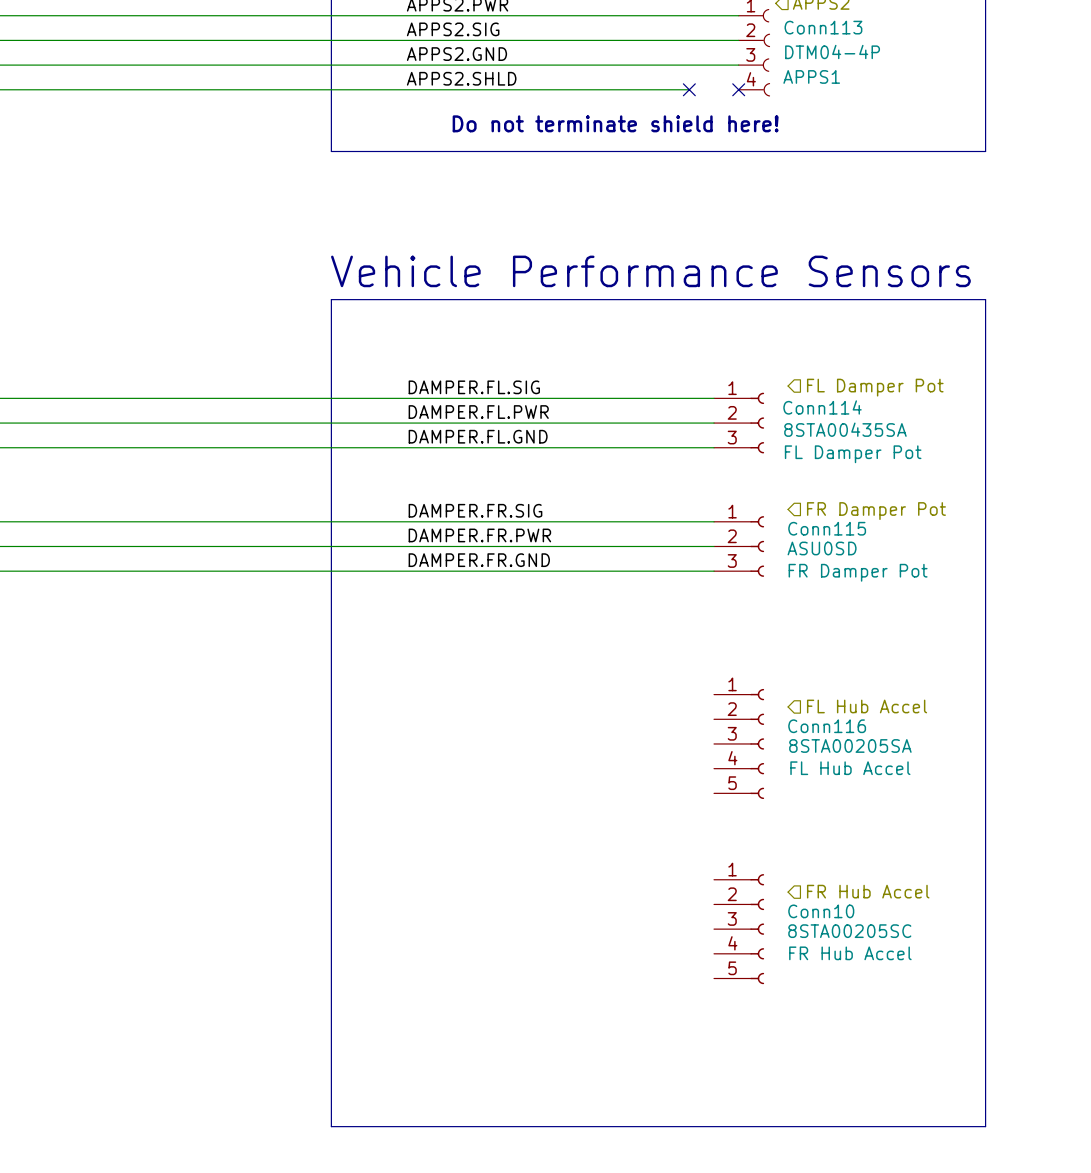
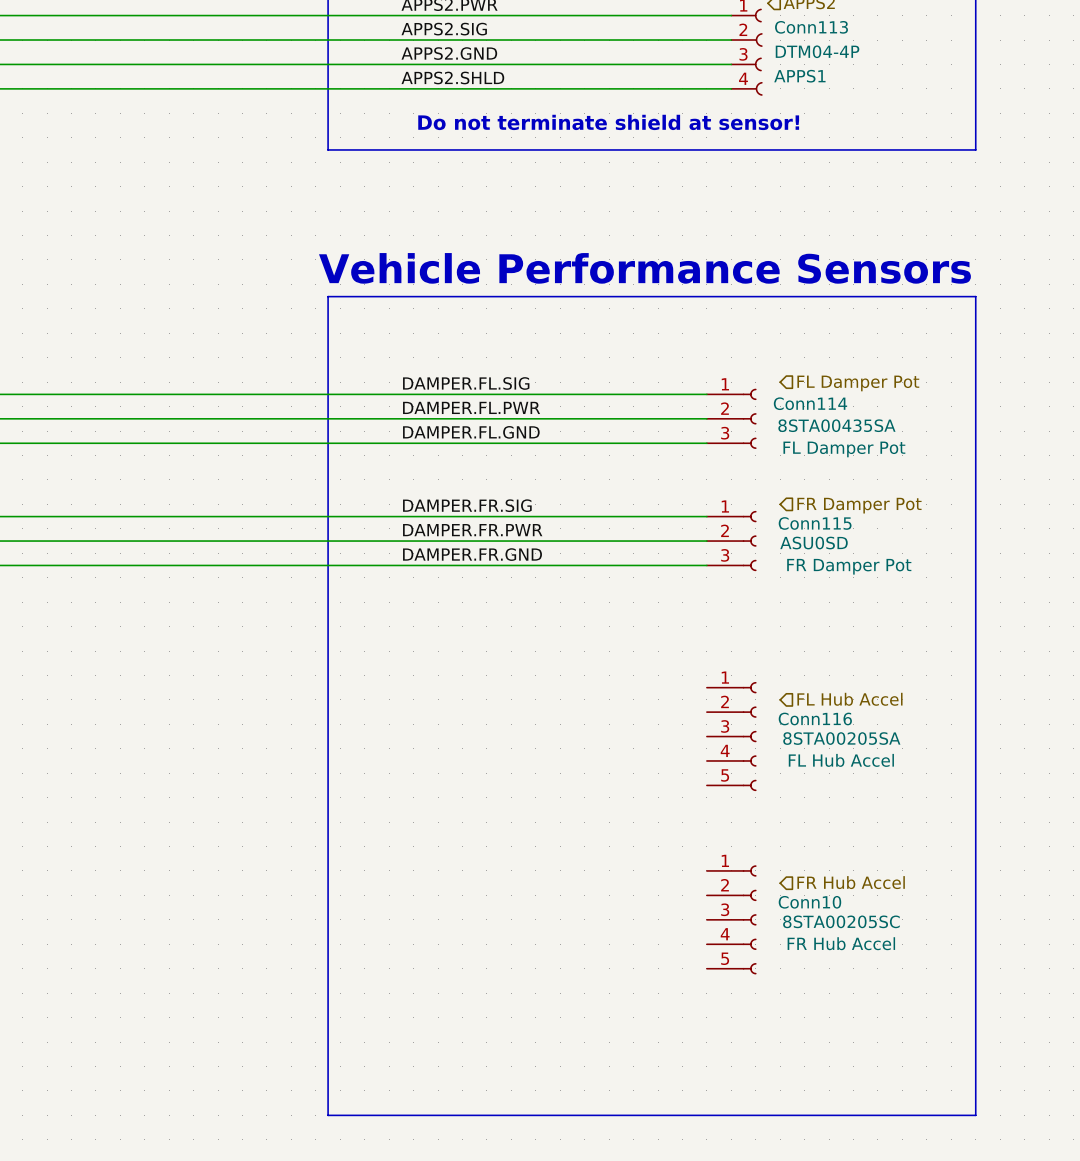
wire: none -> (682, 88) (731, 88)
no-connect mark: (689, 89) -> none
no-connect mark: (738, 89) -> none
text: Do not terminate shield here! (615, 123) -> Do not terminate shield at sensor! (608, 122)

